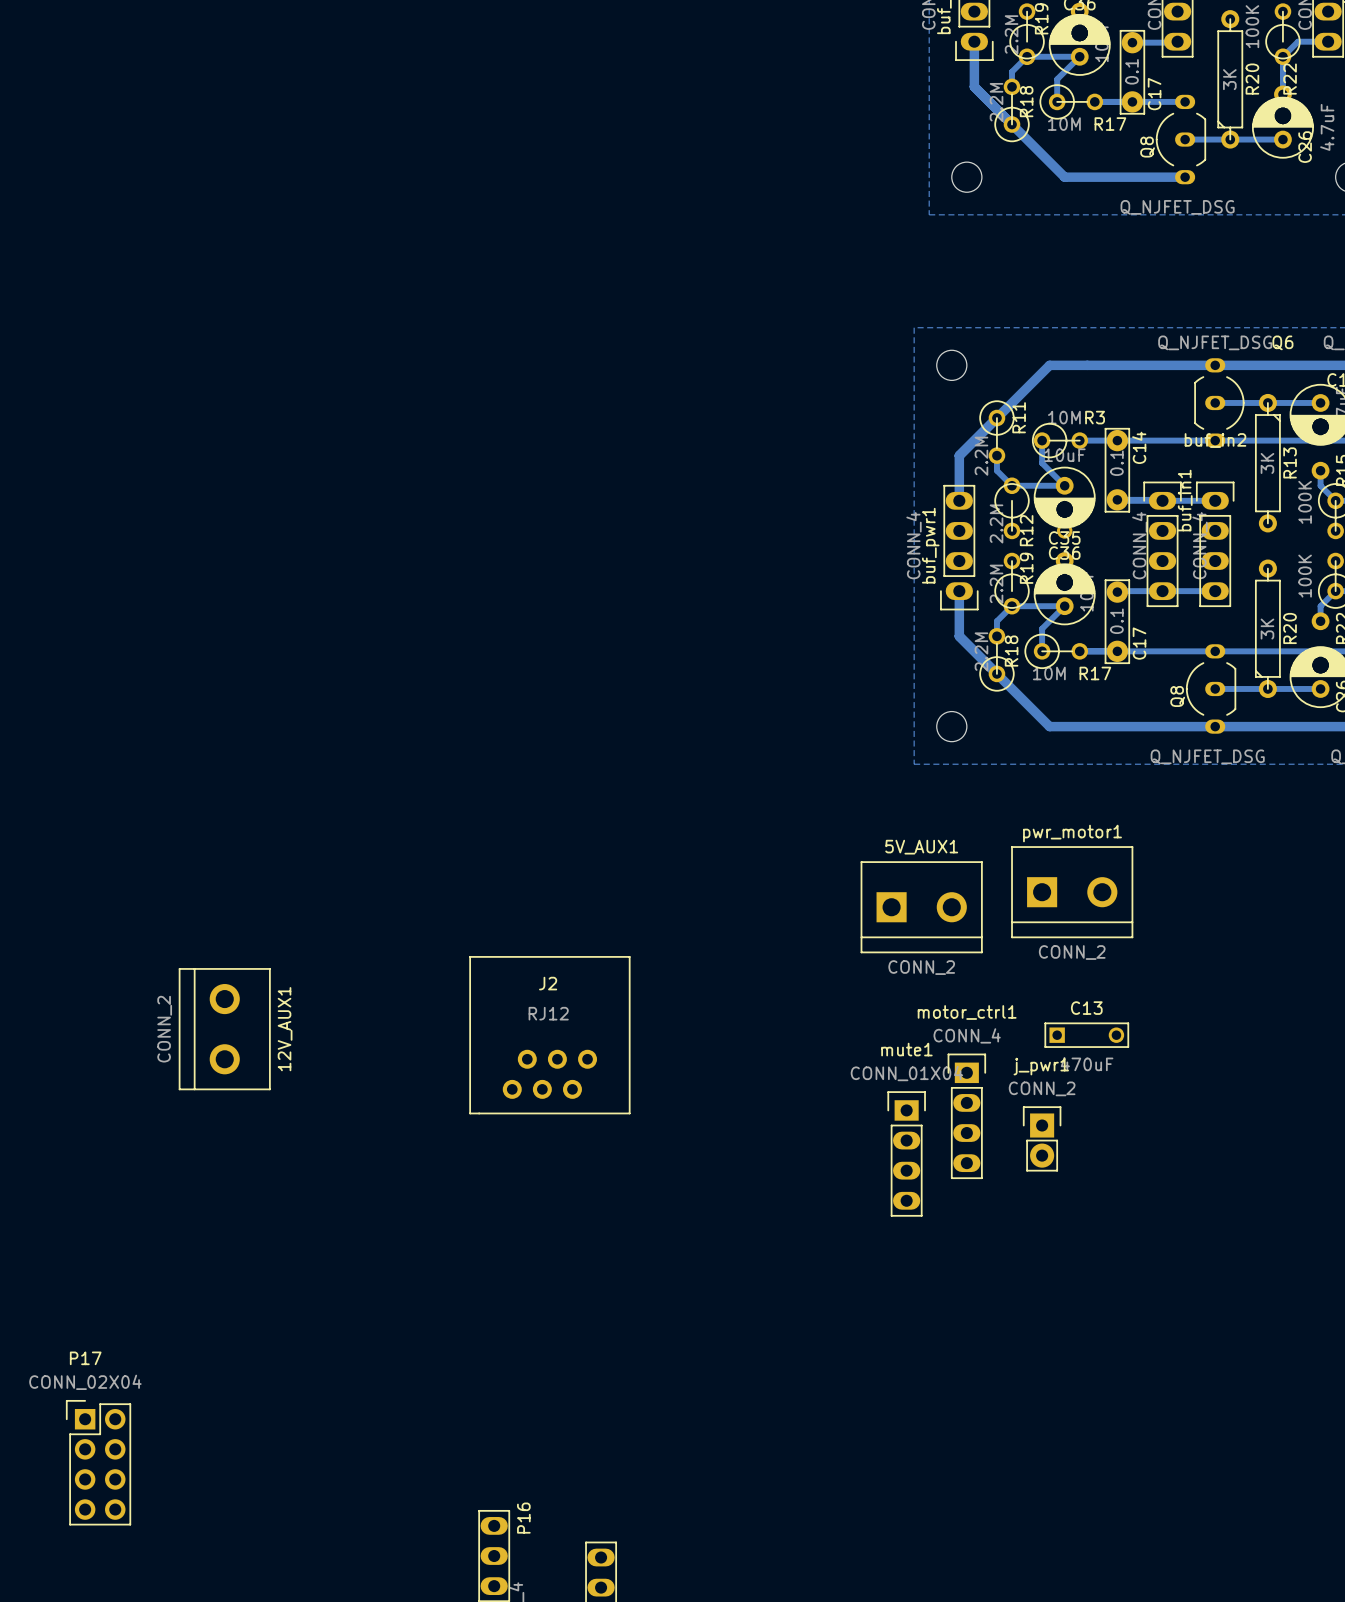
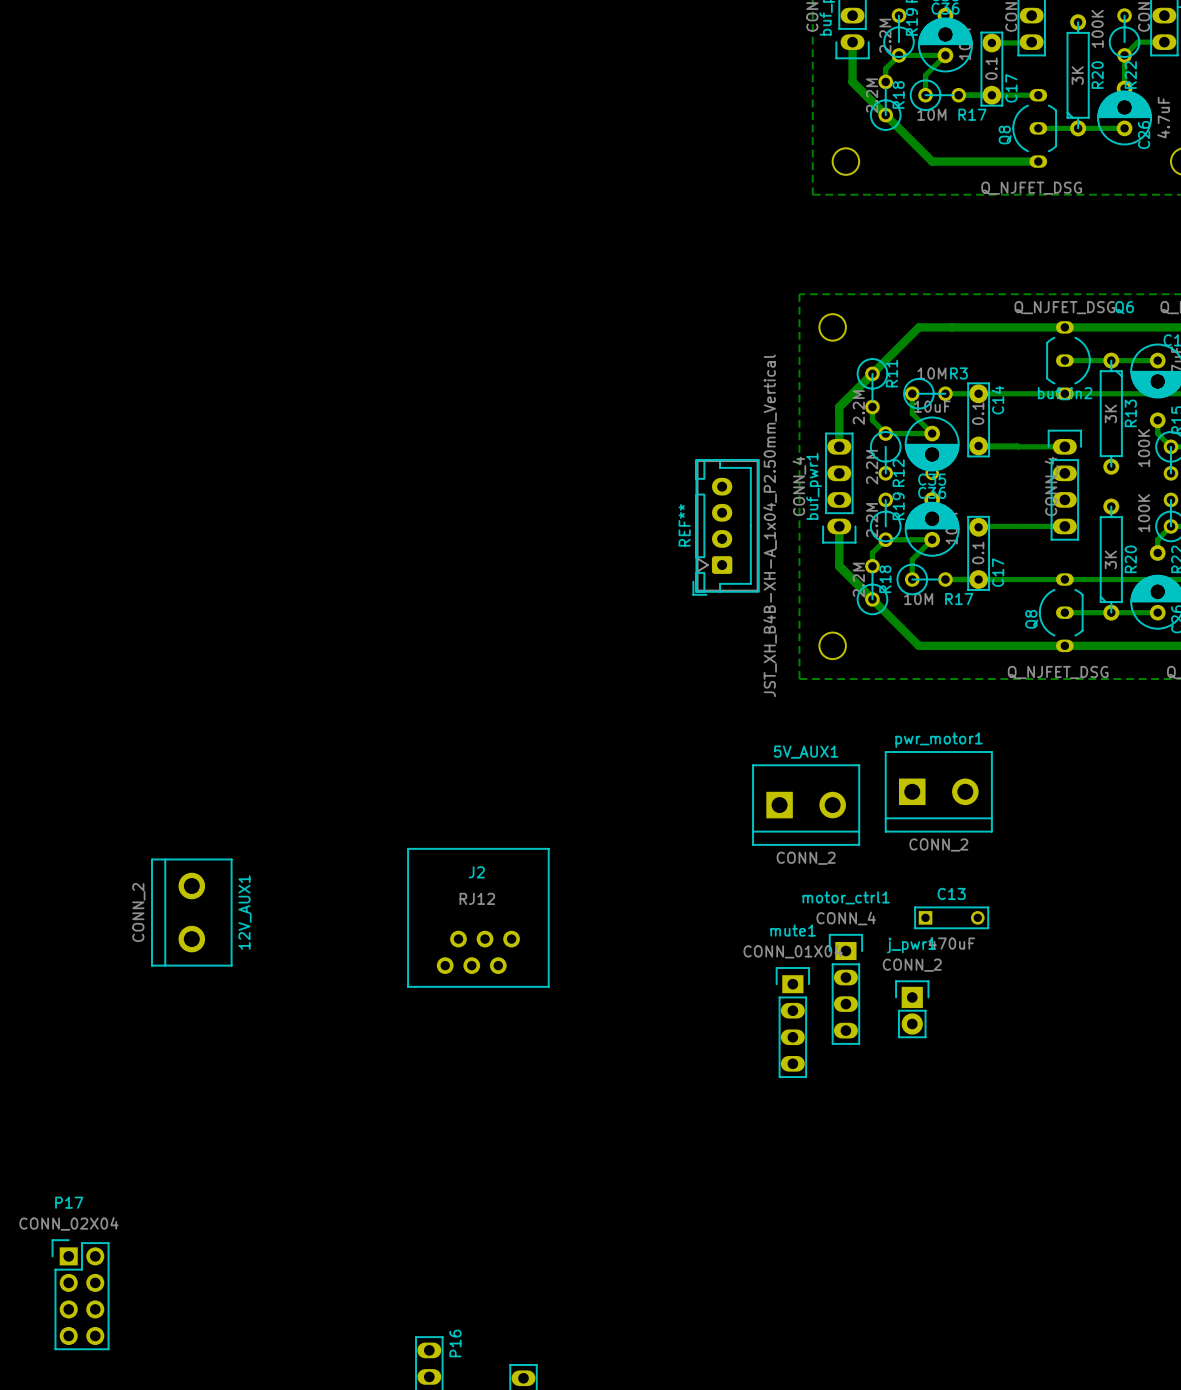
buf_in1: CONN_4 (1162, 544) -> none
REF**: none -> JST_XH_B4B-XH-A_1x04_P2.50mm_Vertical (726, 527)

